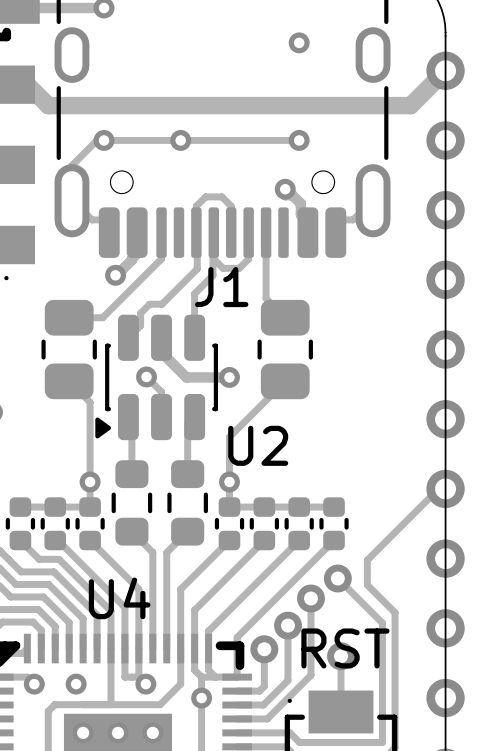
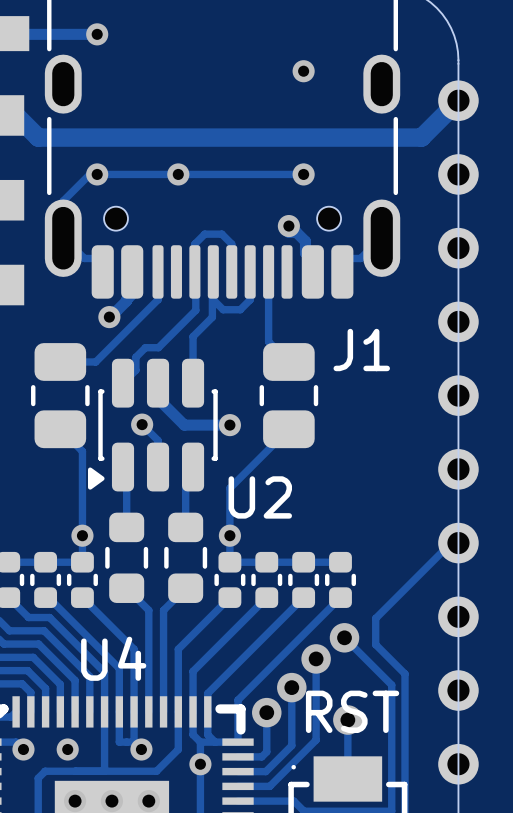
J1 name position: J1 (221, 287) -> J1 (361, 350)

